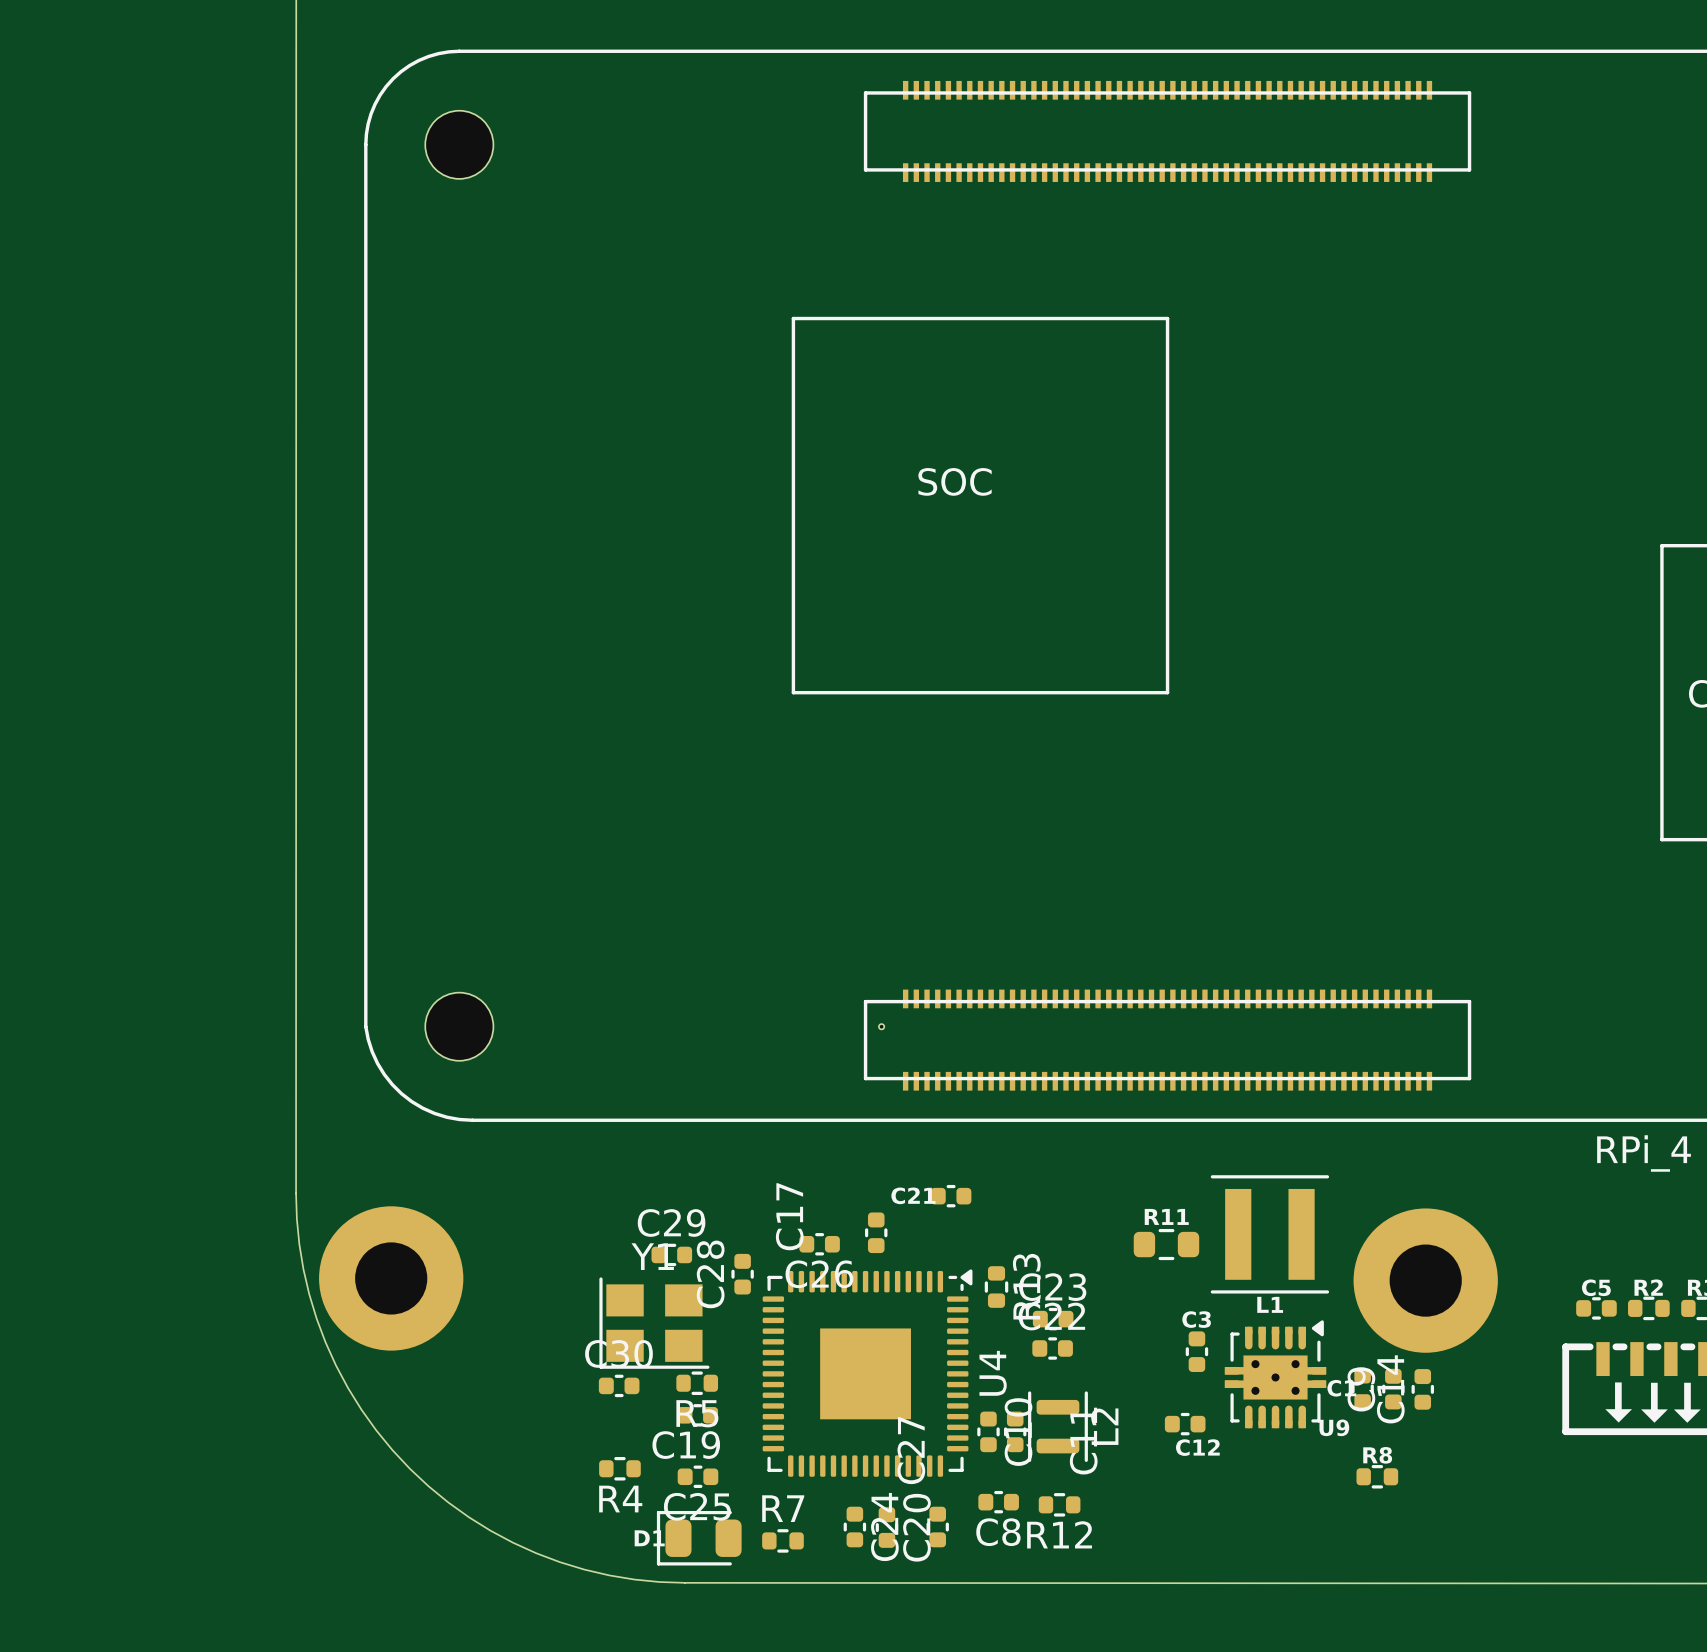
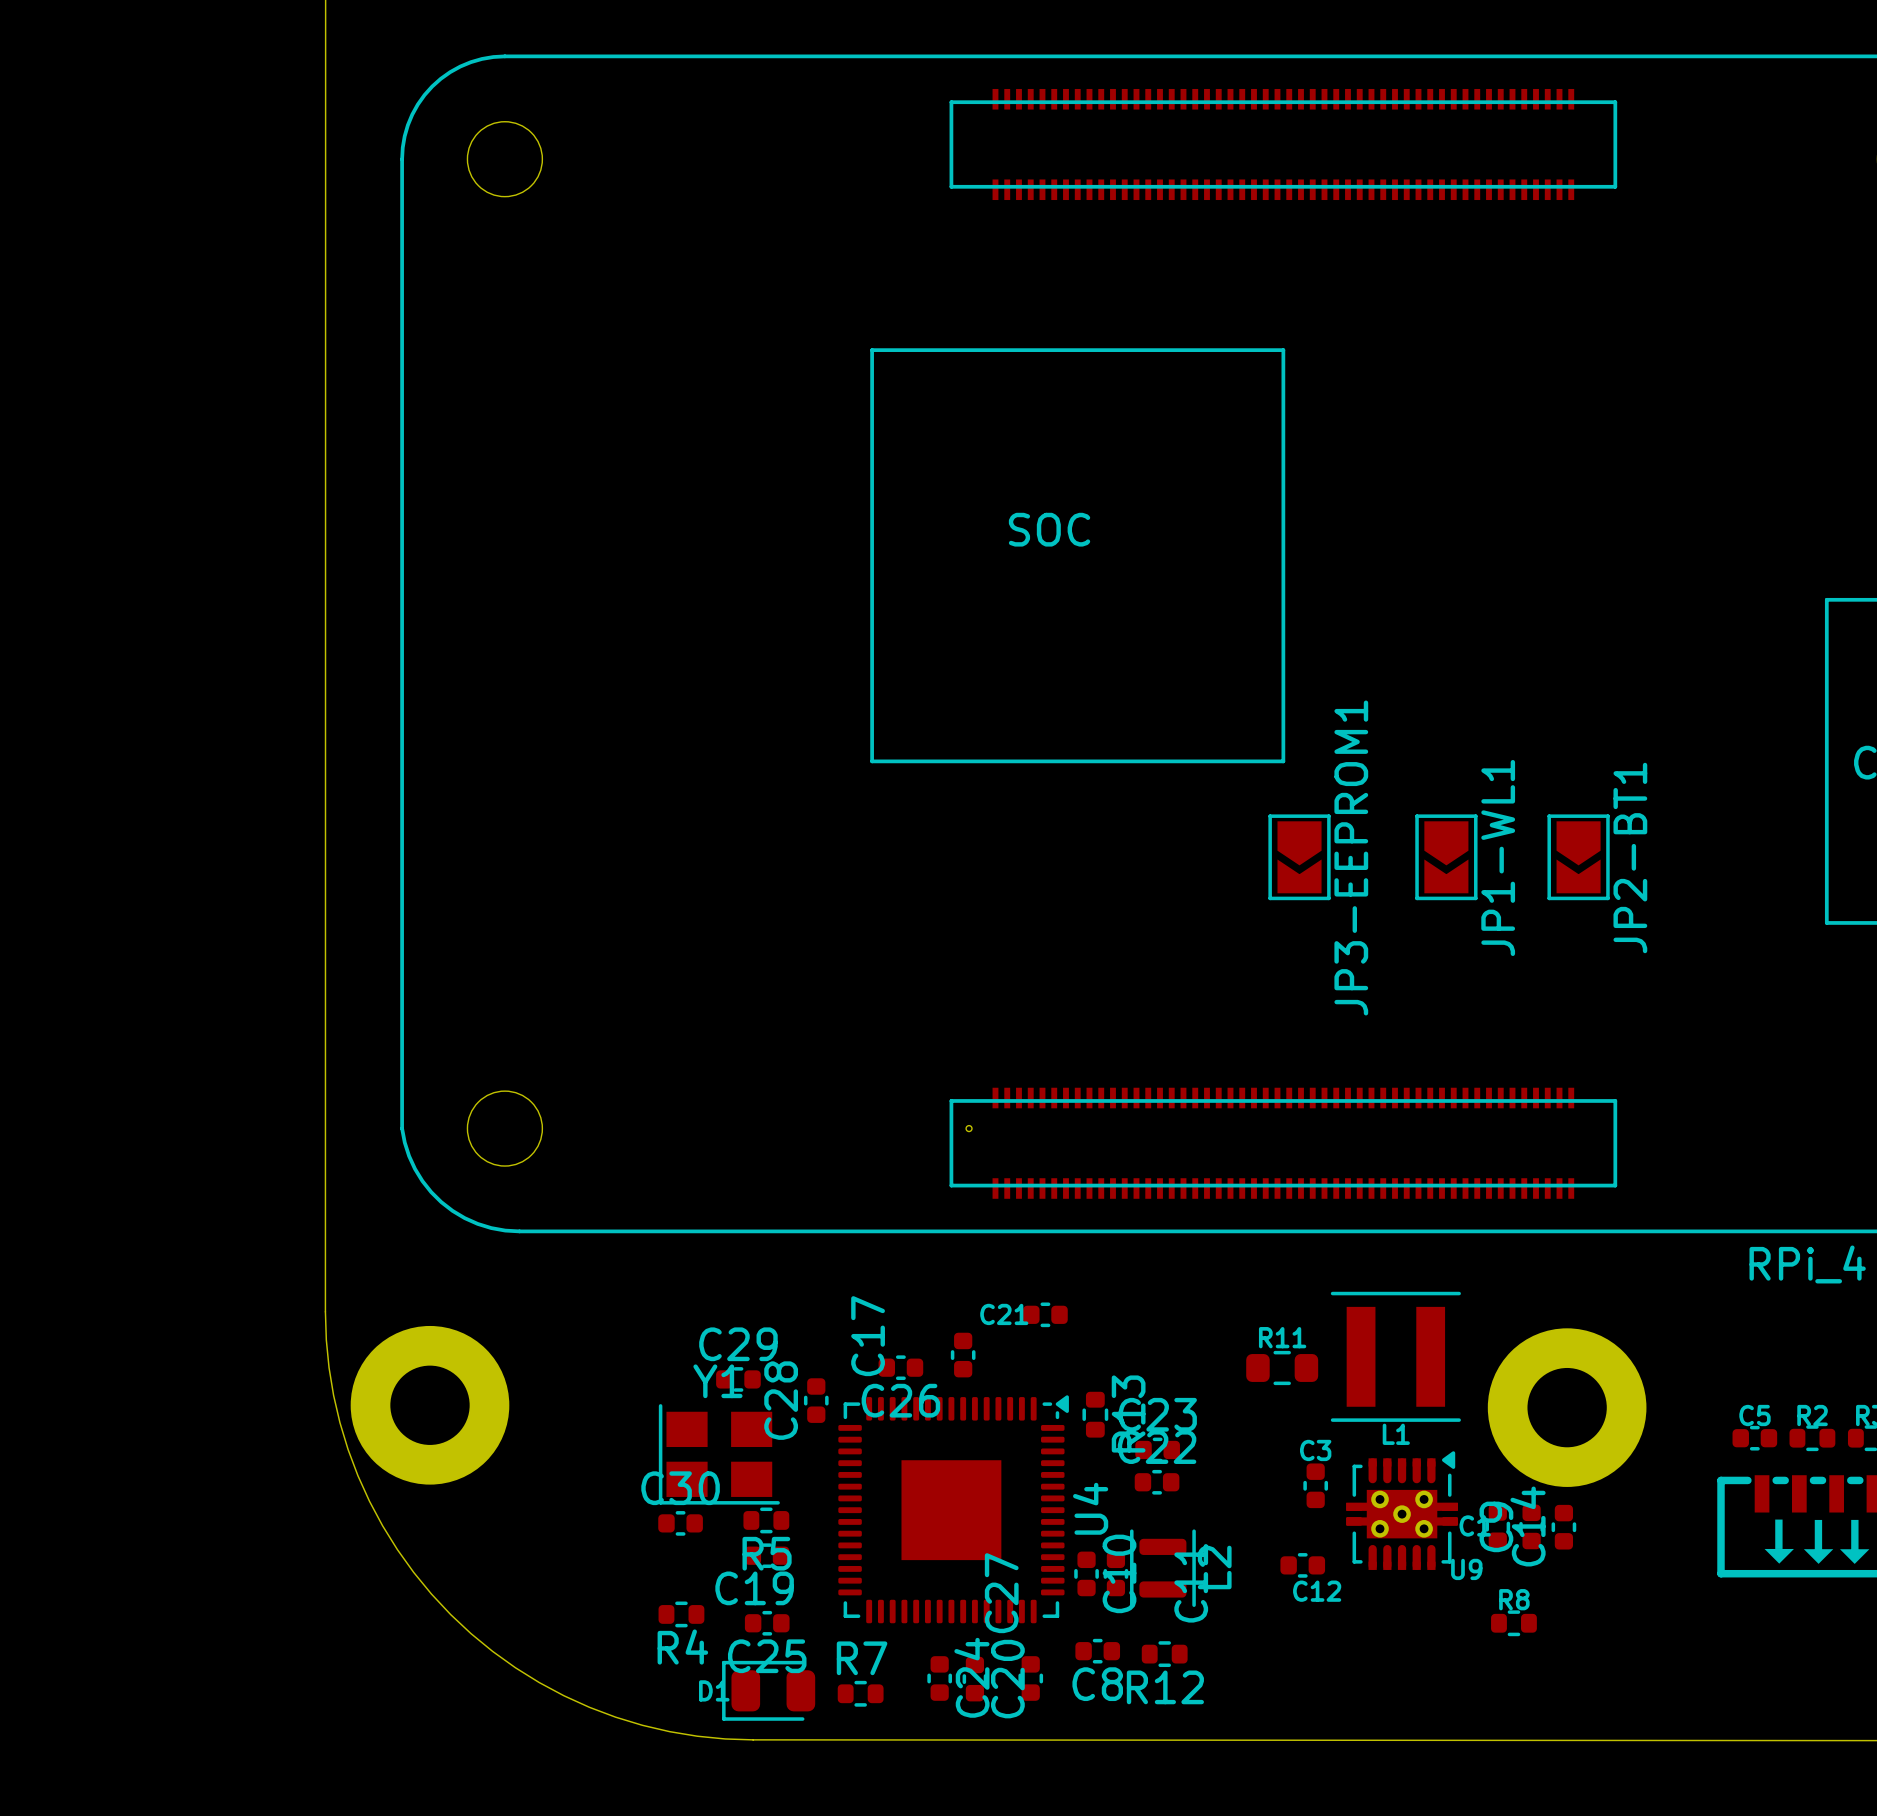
JP3-EEPROM1: none -> (1299, 857)
JP1-WL1: none -> (1446, 857)
JP2-BT1: none -> (1578, 857)

